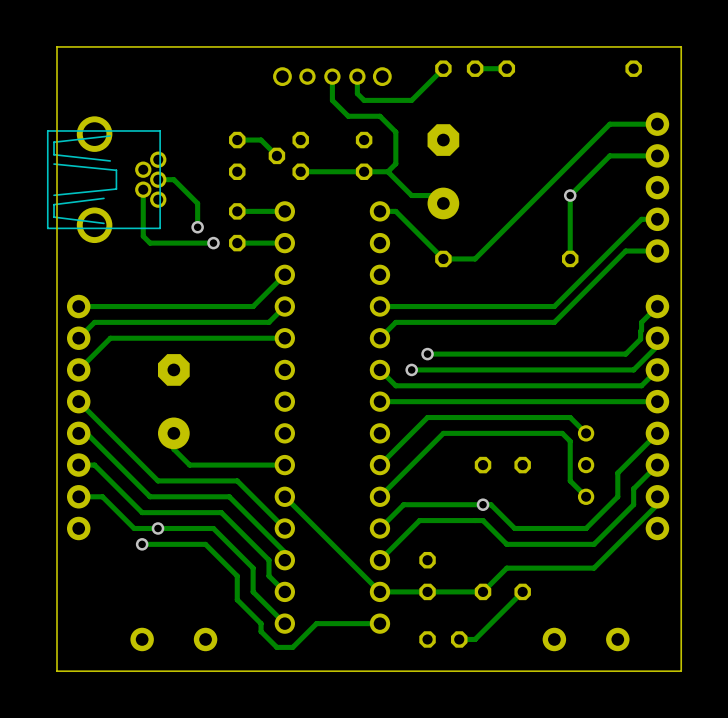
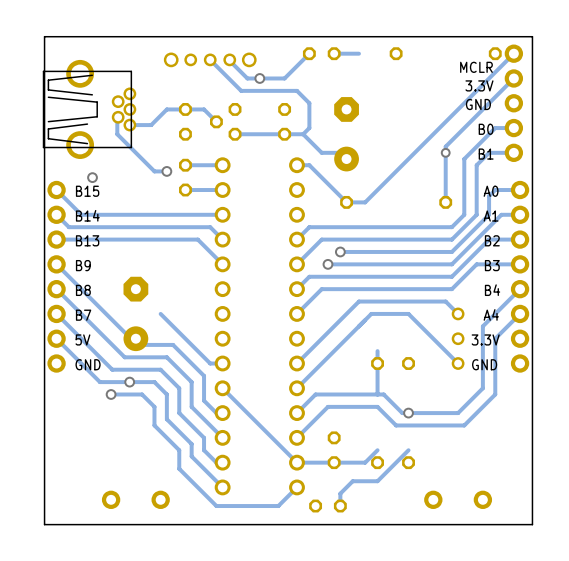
track: none -> (309, 53) (284, 78) (247, 78) (229, 59)
track: (443, 68) (411, 100) (364, 100) (357, 93) (357, 76) -> none
part position: (459, 68) -> (321, 53)
track: (506, 68) (475, 68) -> (358, 53) (334, 53)
track: (332, 76) (332, 100) (348, 116) -> (210, 59) (241, 90) (272, 90)
part position: (332, 76) -> (210, 59)
text: none -> MCLR (476, 67)
via: none -> (259, 78)
text: none -> 3.3V (479, 85)
track: (657, 124) (609, 124) (475, 258) (467, 258) -> (513, 53) (365, 202)
text: none -> GND (478, 104)
track: none -> (185, 109) (166, 109) (151, 125) (129, 125)
track: none -> (118, 117) (117, 134) (154, 171) (166, 171)
track: (657, 155) (609, 155) (570, 195) -> (513, 78) (445, 146) (445, 152)
track: none -> (513, 128) (495, 128) (464, 159) (464, 214) (451, 227) (309, 227) (296, 239)
text: none -> B0 (486, 129)
part position: (106, 179) -> (89, 109)
track: (158, 179) (173, 179) (197, 203) (197, 227) -> none
part position: (657, 187) -> (513, 103)
track: (143, 189) (143, 236) (150, 243) (213, 243) -> none
text: none -> B1 (486, 154)
via: none -> (166, 171)
track: (657, 219) (641, 219) (554, 306) -> (513, 152) (489, 152) (476, 165) (476, 214) (451, 239) (433, 239)
via: none -> (92, 177)
via: (197, 227) -> none
track: none -> (56, 190) (81, 214) (222, 214)
via: (213, 243) -> none
text: none -> B15 (87, 191)
text: none -> A0 (491, 191)
track: (657, 251) (625, 251) (554, 322) -> (520, 190) (495, 190) (489, 196) (489, 214) (451, 251) (433, 251)
track: (284, 274) (253, 306) -> (222, 264) (197, 239)
track: none -> (520, 214) (501, 214) (451, 264) (327, 264)
text: none -> B14 (87, 215)
text: none -> A1 (491, 216)
track: (284, 306) (268, 322) (94, 322) (78, 338) -> (222, 239) (210, 227) (68, 227) (56, 214)
track: (411, 306) (379, 306) -> (321, 239) (309, 251)
track: (657, 306) (641, 322) (640, 339) (625, 354) (578, 354) -> (520, 239) (489, 239) (451, 276)
text: none -> B13 (87, 240)
text: none -> B2 (492, 240)
track: (435, 322) (395, 322) -> none
via: none -> (340, 251)
track: none -> (56, 264) (137, 344) (173, 344) (204, 375) (204, 400) (216, 413) (222, 413)
track: (284, 338) (110, 338) (78, 369) -> none
via: none -> (327, 264)
track: (657, 338) (657, 346) (633, 369) (578, 369) -> (520, 264) (476, 264) (451, 289)
text: none -> B9 (83, 265)
text: none -> B3 (492, 265)
via: (427, 354) -> none
track: (379, 369) (395, 385) (459, 385) -> (296, 289) (309, 276) (334, 276)
via: (411, 369) -> none
track: (657, 369) (641, 385) (570, 385) -> (458, 313) (445, 301)
text: none -> B8 (83, 290)
text: none -> B4 (492, 290)
track: (78, 401) (158, 480) (237, 480) -> (56, 289) (124, 357) (166, 357) (185, 375)
track: (475, 401) (379, 401) -> (321, 289) (296, 313)
track: (657, 401) (522, 401) -> (458, 363) (408, 313)
text: none -> A4 (491, 314)
text: none -> B7 (83, 315)
part position: (78, 417) -> (56, 276)
track: (427, 417) (570, 417) (586, 433) -> (334, 326) (358, 301)
part position: (657, 417) -> (520, 276)
track: (78, 433) (86, 433) (150, 496) (229, 496) (284, 552) (284, 560) -> none
track: (173, 433) (173, 449) (189, 465) (268, 465) -> (160, 313) (210, 363)
track: (443, 433) (562, 433) (570, 441) (570, 480) (586, 496) -> (346, 338) (371, 313)
track: (657, 433) (617, 473) -> (520, 289) (482, 326) (482, 369)
text: none -> 5V (82, 339)
text: none -> 3.3V (485, 339)
track: none -> (377, 351) (377, 394)
track: (78, 465) (94, 465) (142, 512) (221, 512) (268, 560) (268, 576) (284, 591) -> (56, 313) (112, 369) (160, 369) (179, 388) (179, 413) (204, 437) (204, 450) (216, 462) (222, 462)
part position: (586, 465) -> (458, 338)
track: (657, 465) (633, 488) -> (520, 313) (495, 338) (495, 382)
text: none -> GND (88, 364)
text: none -> GND (484, 364)
via: none -> (129, 382)
track: (245, 488) (284, 528) -> (191, 382) (191, 406) (222, 437)
track: (78, 496) (102, 496) (134, 528) (213, 528) (253, 568) (253, 591) -> (56, 338) (99, 382) (154, 382) (166, 394) (166, 419) (191, 444) (191, 456) (197, 462)
track: (657, 496) (657, 504) (594, 568) (506, 568) (483, 591) (467, 591) -> (377, 450) (365, 462)
via: none -> (111, 394)
via: (483, 504) -> none
via: (158, 528) -> none
via: none -> (408, 413)
track: (142, 544) (205, 544) (237, 576) (237, 599) (261, 623) (261, 631) -> (111, 394) (142, 394) (154, 406) (154, 425) (179, 450) (179, 468) (204, 493)
via: (142, 544) -> none
track: none -> (408, 450) (377, 481) (352, 481) (340, 493) (340, 506)
track: (522, 591) (475, 639) (459, 639) -> none
track: (379, 623) (316, 623) (292, 647) -> (296, 487) (278, 506) (228, 506)
part position: (443, 639) -> (327, 506)

